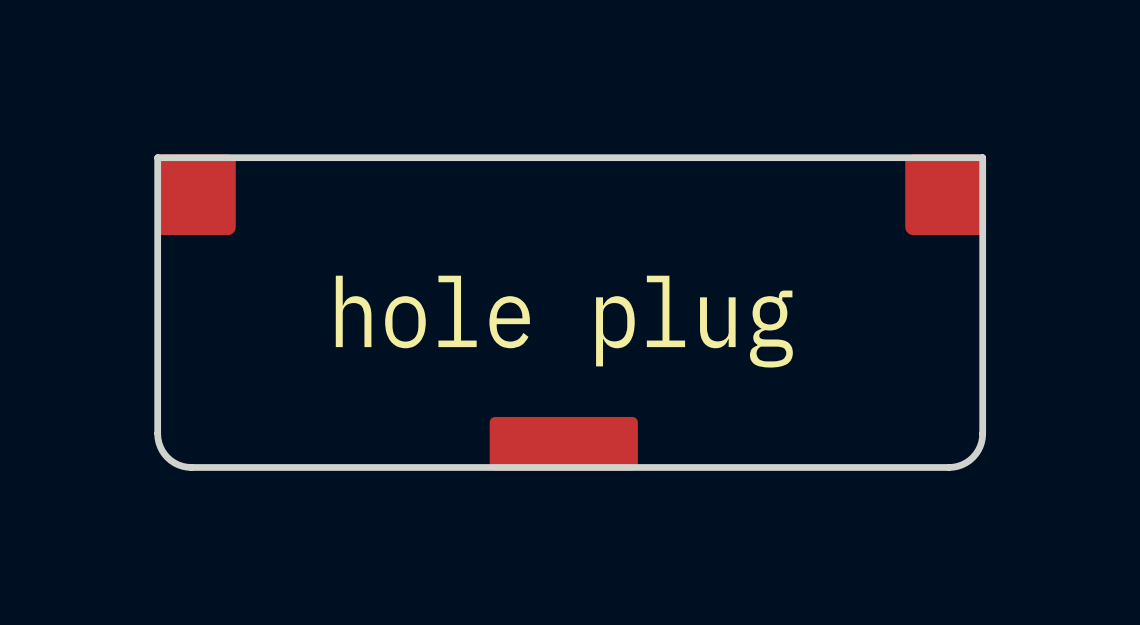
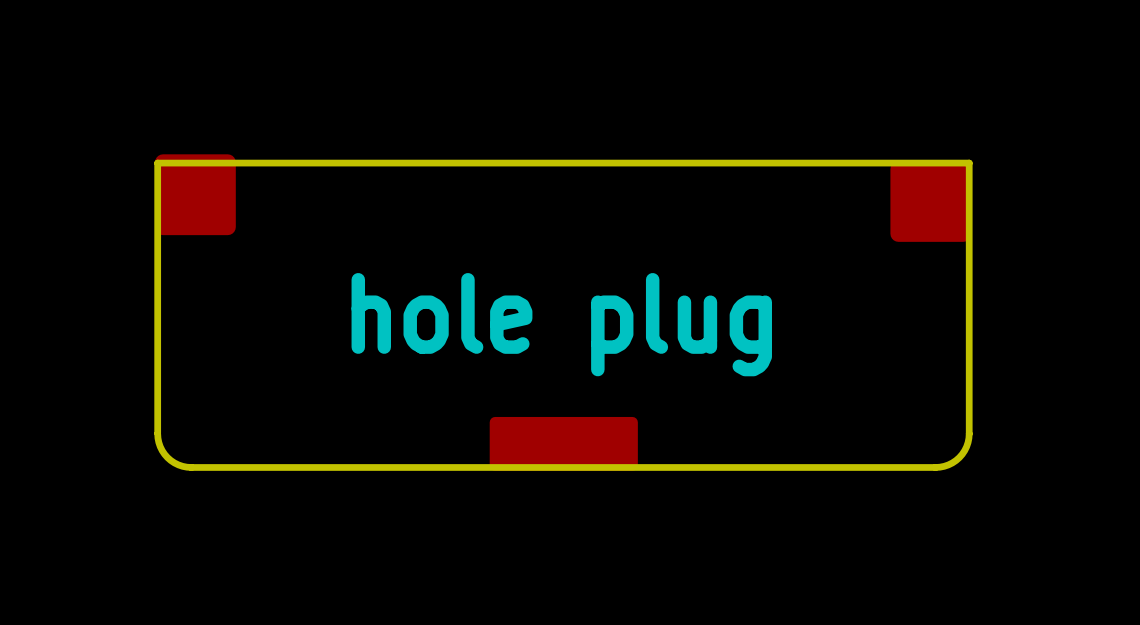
board edge: (157, 163) (157, 157) (982, 157) (982, 438) (975, 454) (965, 462) (953, 467) (935, 467) -> (157, 163) (969, 163) (968, 438) (964, 450) (956, 460) (944, 466) (935, 467)
part position: (945, 194) -> (930, 201)

